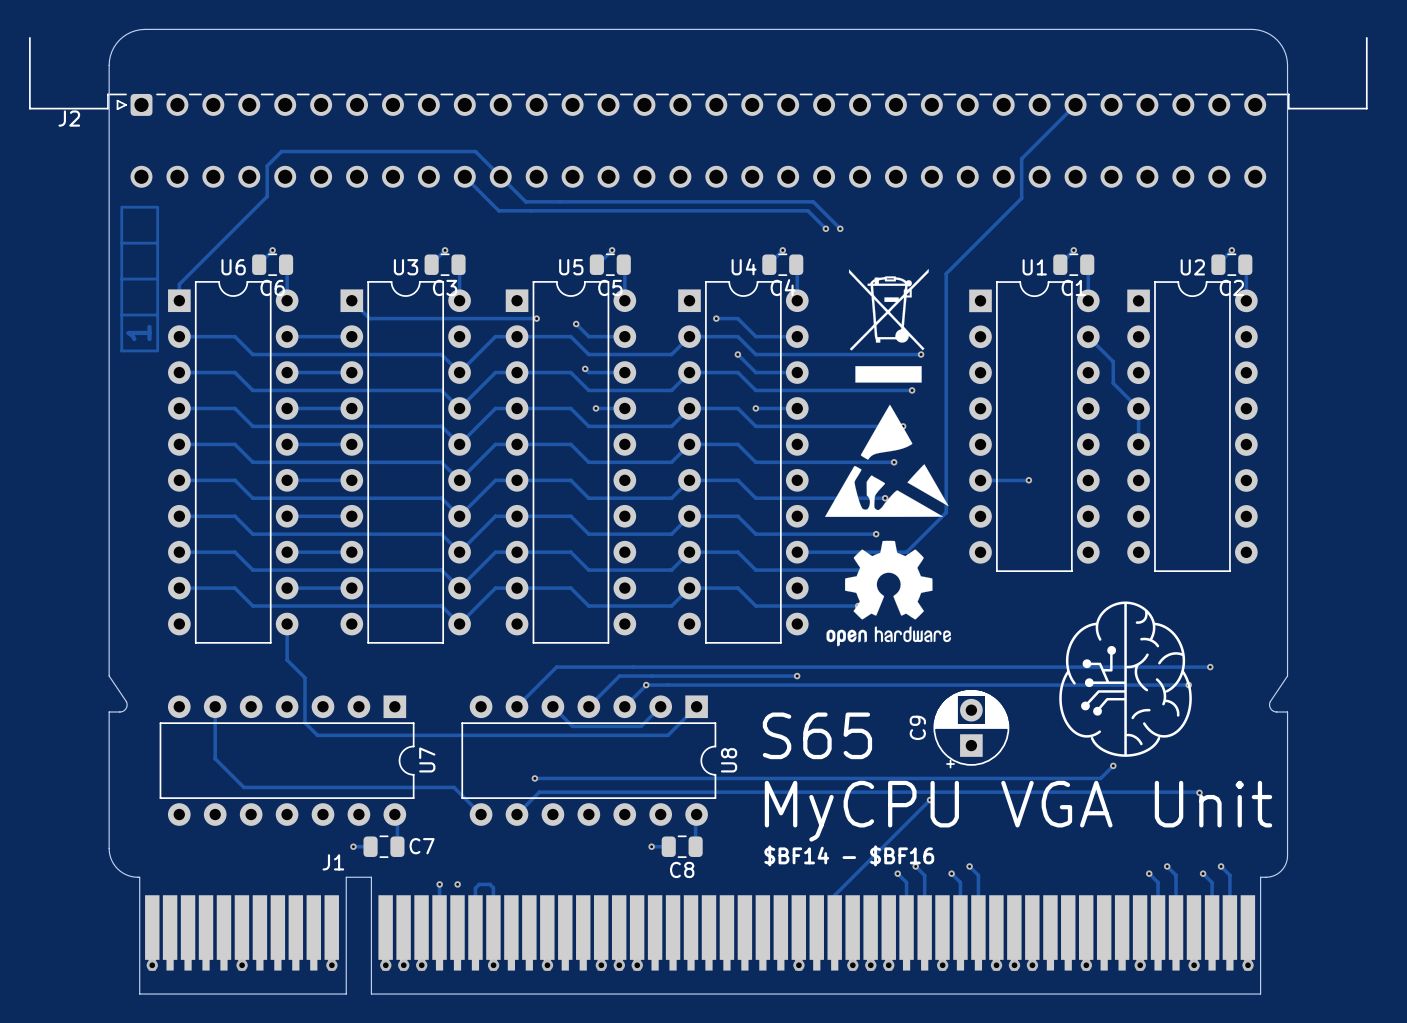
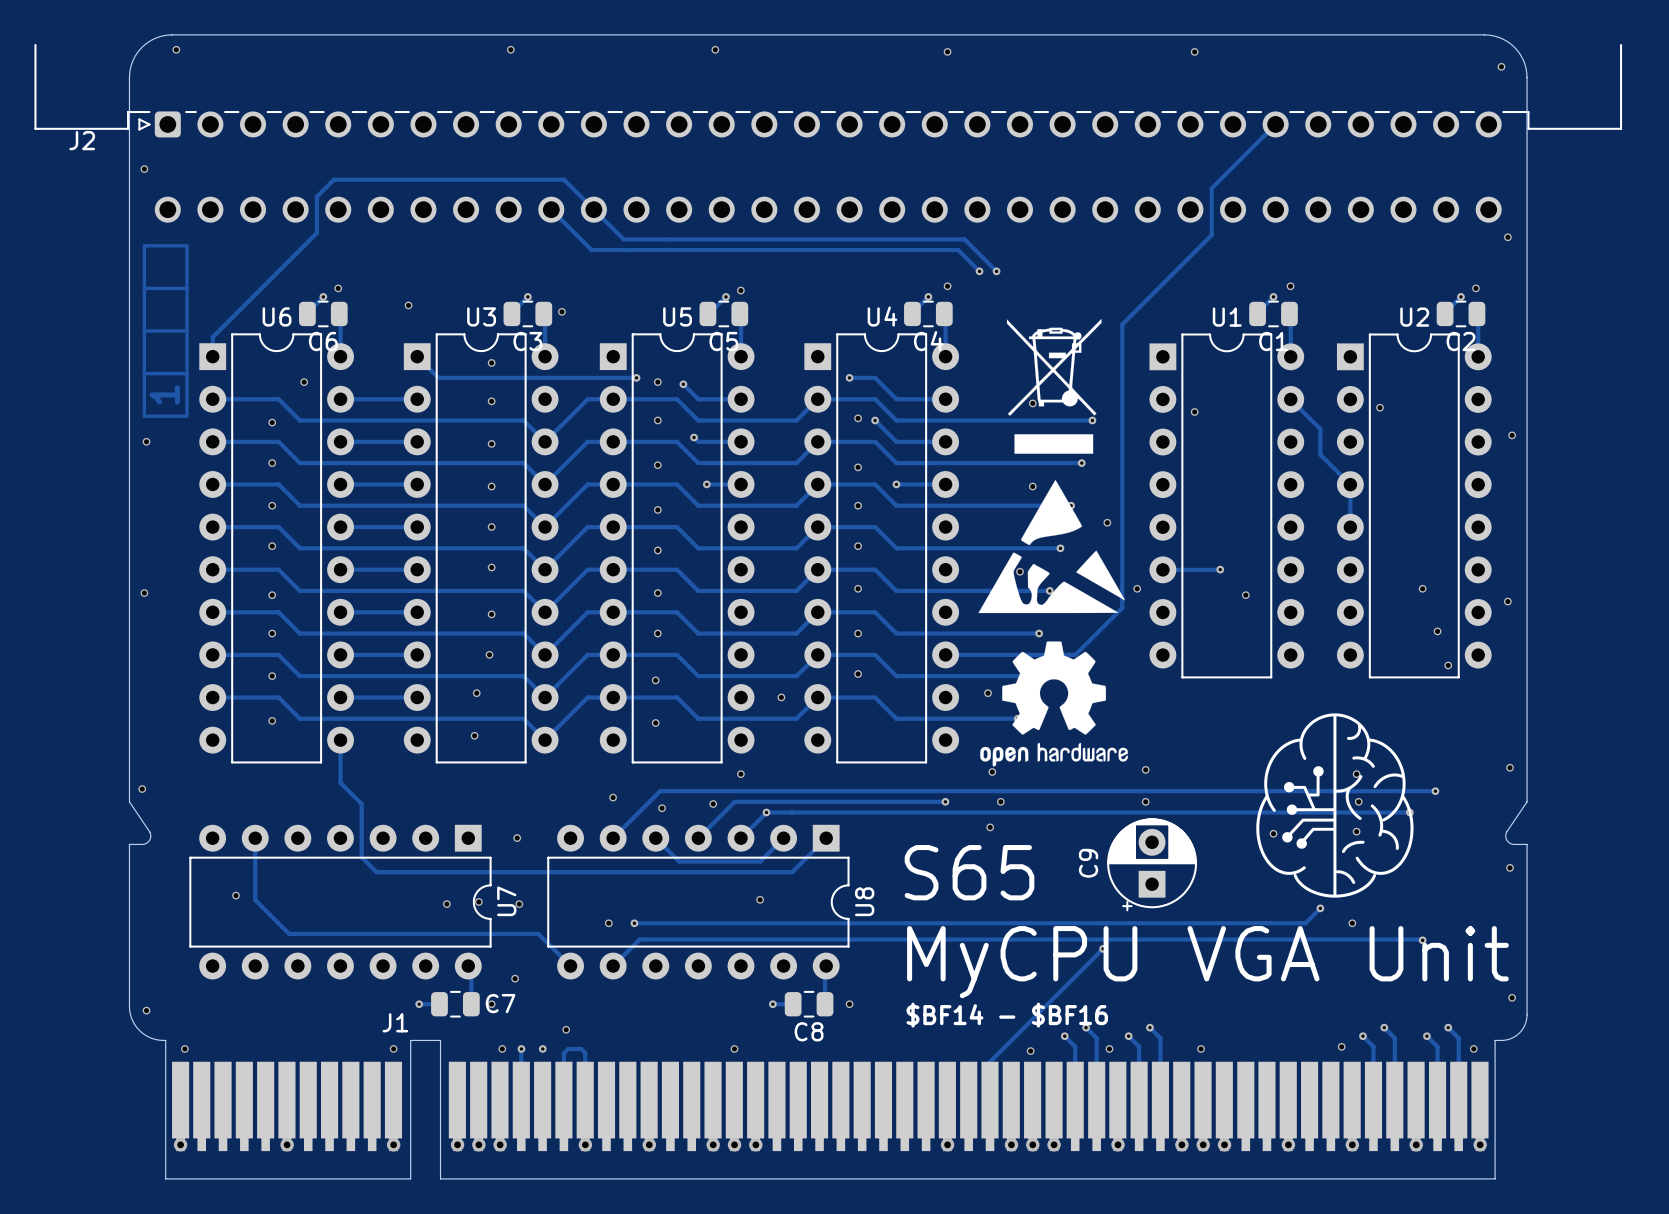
via: none -> (176, 49)
via: none -> (510, 49)
via: none -> (715, 49)
via: none -> (947, 51)
via: none -> (1194, 51)
via: none -> (1501, 66)
via: none -> (144, 169)
via: none -> (1507, 237)
via: none -> (947, 286)
via: none -> (1290, 286)
via: none -> (338, 288)
via: none -> (1475, 288)
via: none -> (740, 290)
via: none -> (408, 305)
via: none -> (561, 311)
via: none -> (491, 362)
via: none -> (304, 382)
via: none -> (657, 382)
via: none -> (491, 401)
via: none -> (1032, 403)
via: none -> (1380, 407)
via: none -> (1194, 411)
via: none -> (858, 418)
via: none -> (657, 420)
via: none -> (272, 422)
via: none -> (1512, 435)
via: none -> (146, 441)
via: none -> (491, 443)
via: none -> (272, 463)
via: none -> (657, 465)
via: none -> (858, 467)
via: none -> (491, 486)
via: none -> (1032, 486)
via: none -> (272, 505)
via: none -> (858, 505)
via: none -> (657, 509)
via: none -> (1107, 522)
via: none -> (491, 527)
via: none -> (272, 546)
via: none -> (858, 546)
via: none -> (657, 550)
via: none -> (491, 567)
via: none -> (1019, 571)
via: none -> (858, 588)
via: none -> (1137, 588)
via: none -> (1422, 588)
via: none -> (144, 593)
via: none -> (657, 593)
via: none -> (272, 595)
via: none -> (1245, 595)
via: none -> (1507, 601)
via: none -> (491, 614)
via: none -> (1437, 631)
via: none -> (272, 633)
via: none -> (657, 633)
via: none -> (858, 633)
via: none -> (489, 654)
via: none -> (1448, 665)
via: none -> (858, 674)
via: none -> (272, 676)
via: none -> (655, 680)
via: none -> (476, 693)
via: none -> (988, 693)
via: none -> (781, 697)
via: none -> (272, 720)
via: none -> (655, 723)
via: none -> (474, 735)
via: none -> (1510, 767)
via: none -> (1145, 769)
via: none -> (992, 772)
via: none -> (740, 774)
via: none -> (1356, 774)
via: none -> (142, 789)
via: none -> (613, 797)
via: none -> (1000, 801)
via: none -> (1145, 801)
via: none -> (1358, 801)
via: none -> (713, 803)
via: none -> (662, 808)
via: none -> (990, 827)
via: none -> (1356, 831)
via: none -> (1273, 833)
via: none -> (517, 838)
via: none -> (1510, 867)
via: none -> (235, 895)
via: none -> (760, 899)
via: none -> (478, 901)
via: none -> (446, 904)
via: none -> (519, 904)
via: none -> (608, 923)
via: none -> (1352, 923)
via: none -> (515, 978)
via: none -> (1512, 997)
via: none -> (491, 1004)
via: none -> (849, 1004)
via: none -> (146, 1010)
via: none -> (566, 1029)
via: none -> (1341, 1046)
via: none -> (184, 1048)
via: none -> (393, 1048)
via: none -> (502, 1048)
via: none -> (734, 1048)
via: none -> (1109, 1048)
via: none -> (1201, 1048)
via: none -> (1473, 1048)
via: none -> (1030, 1051)

